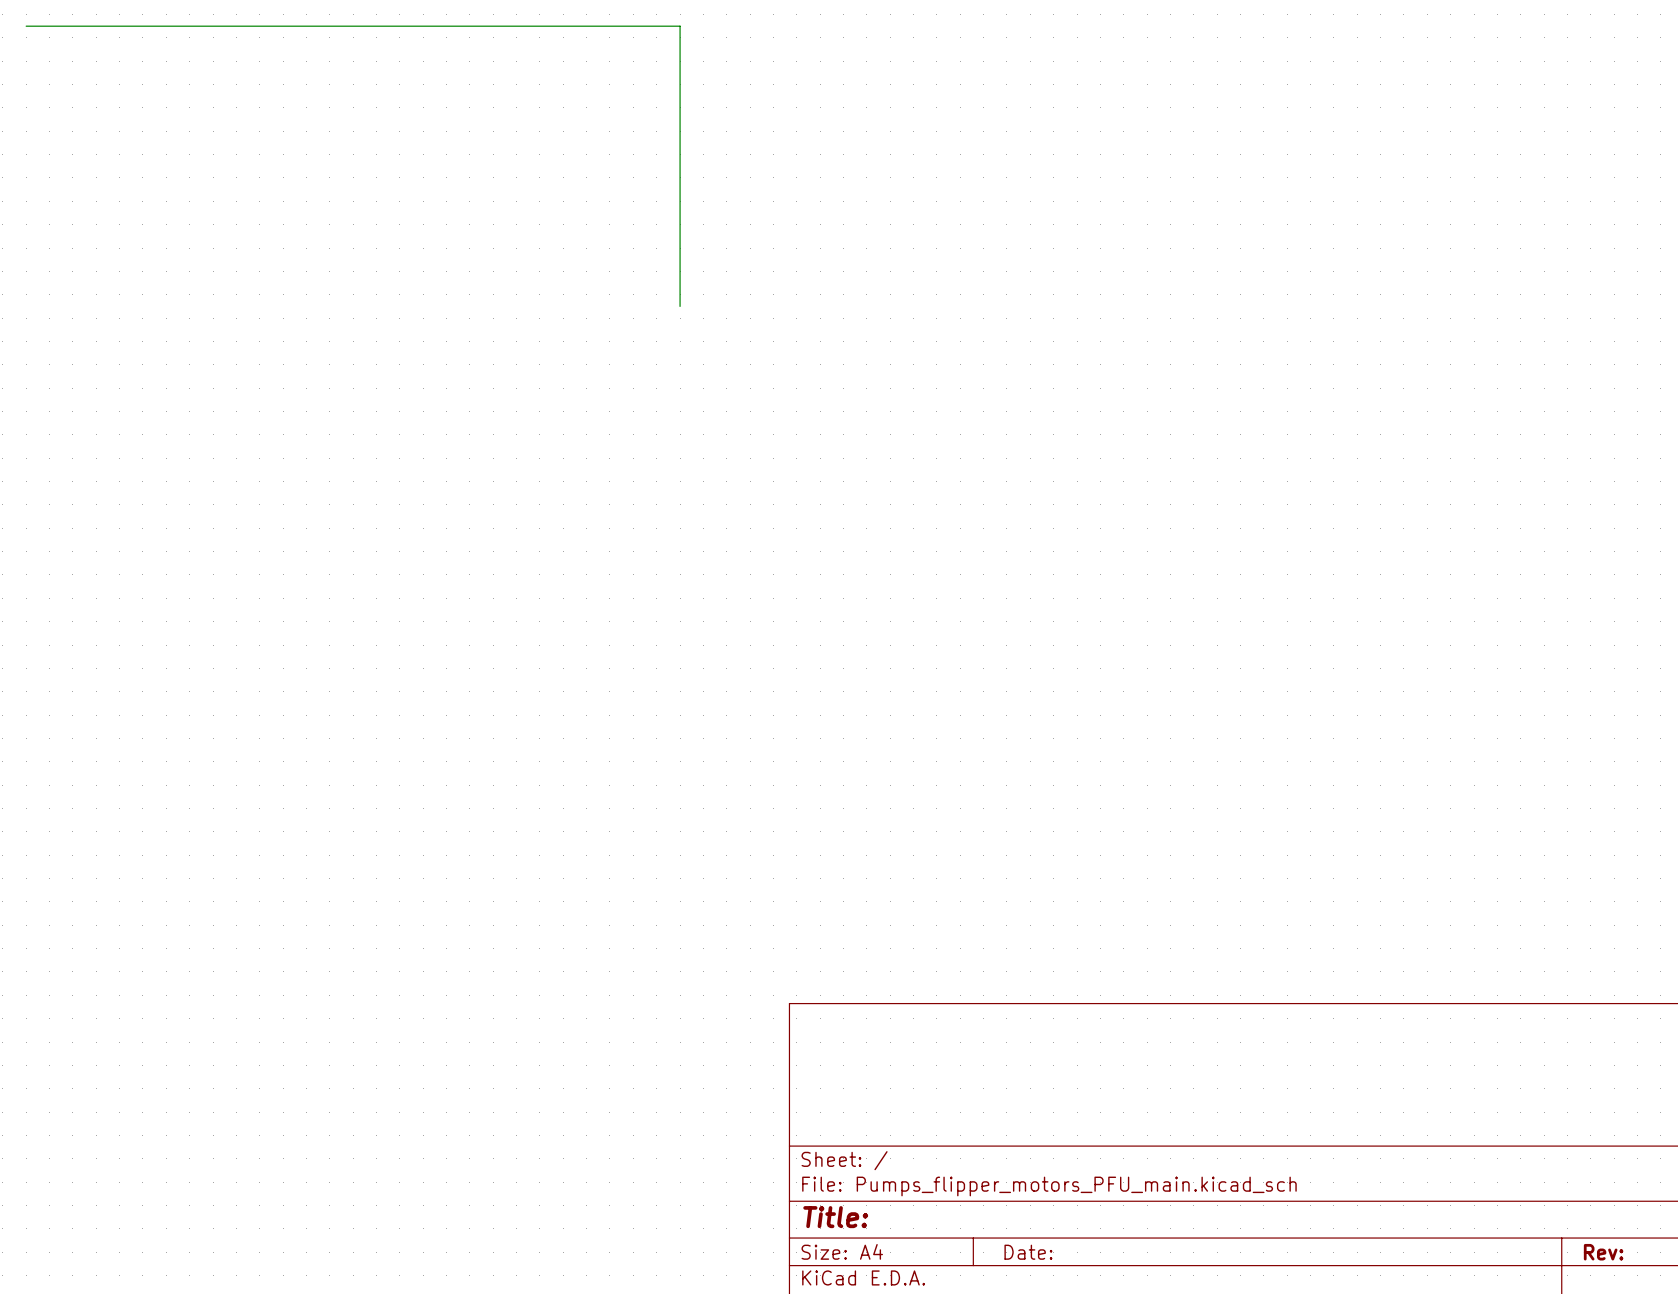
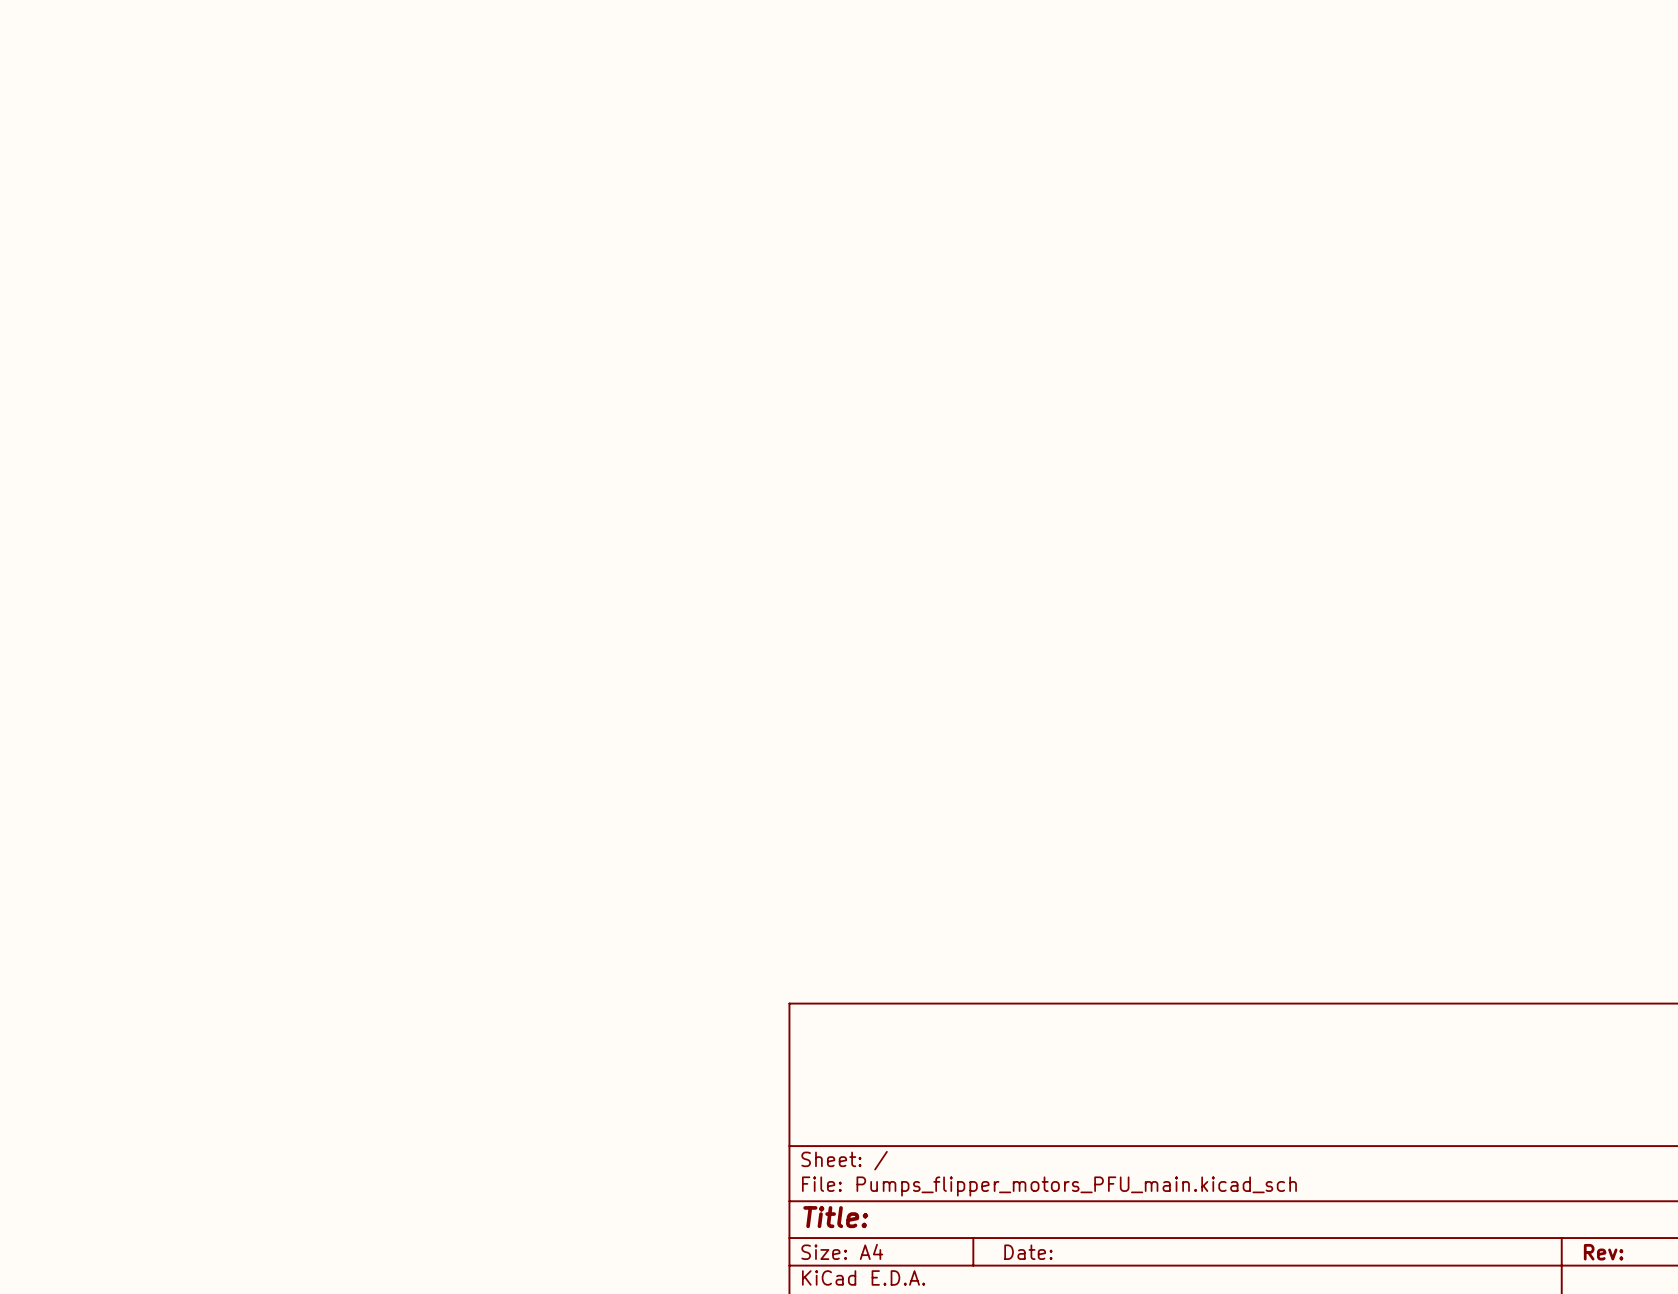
wire: (26, 26) (680, 26) (680, 306) -> none

